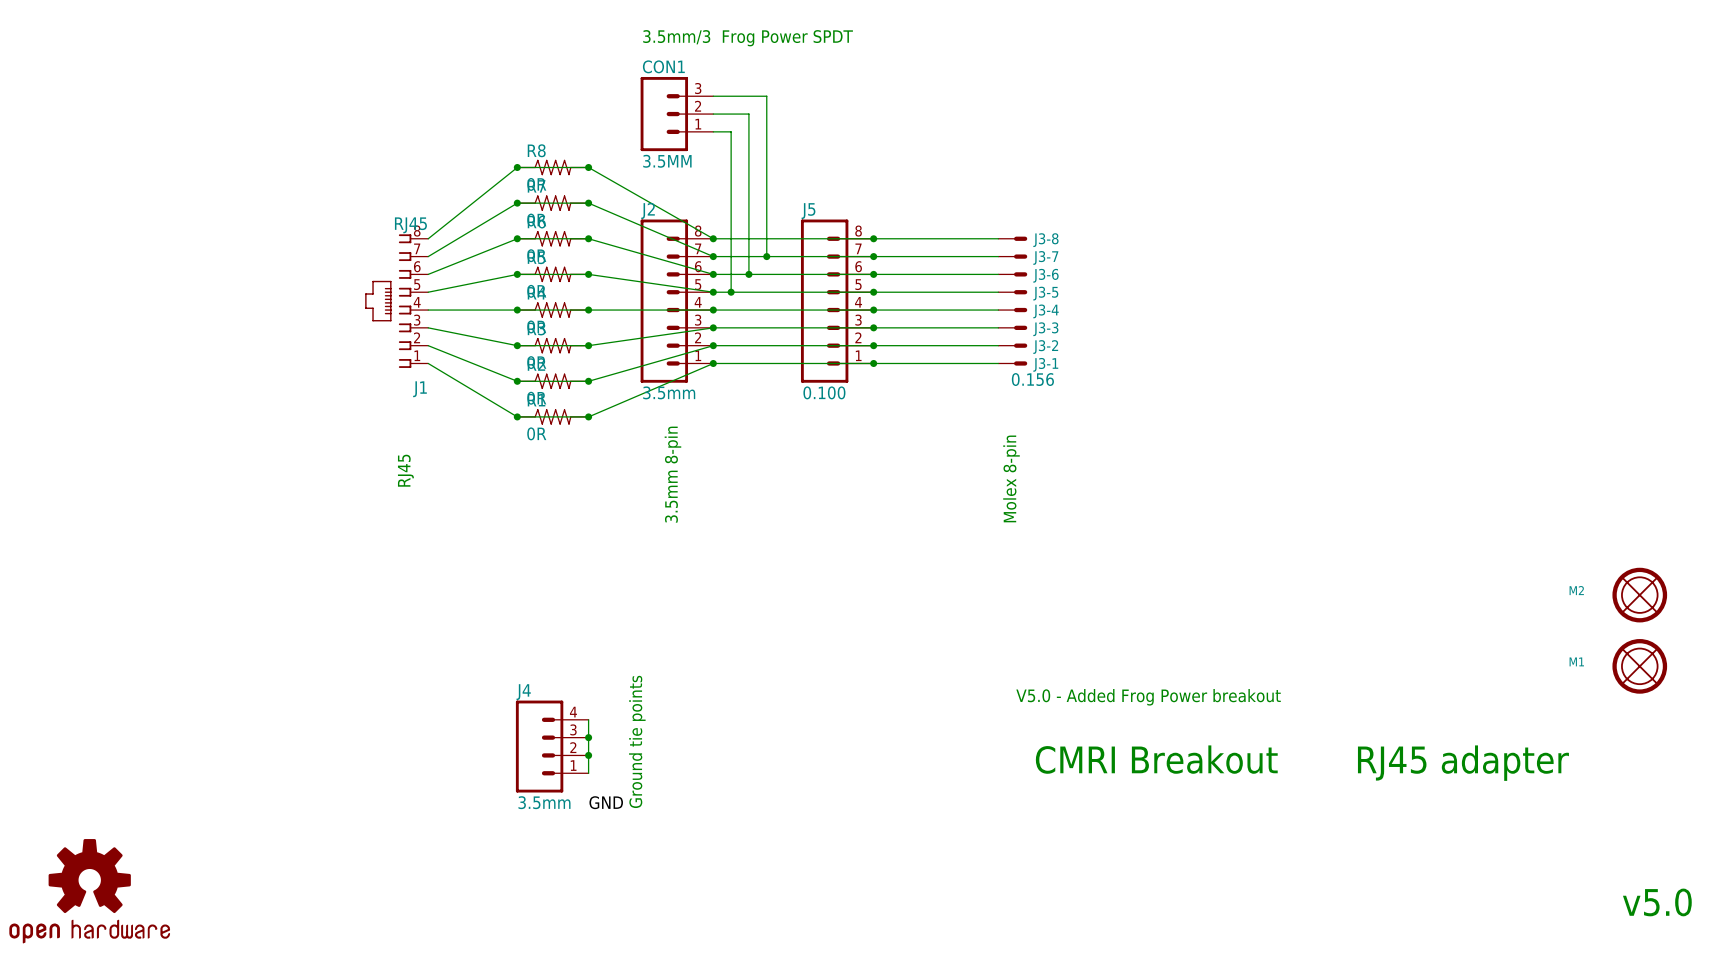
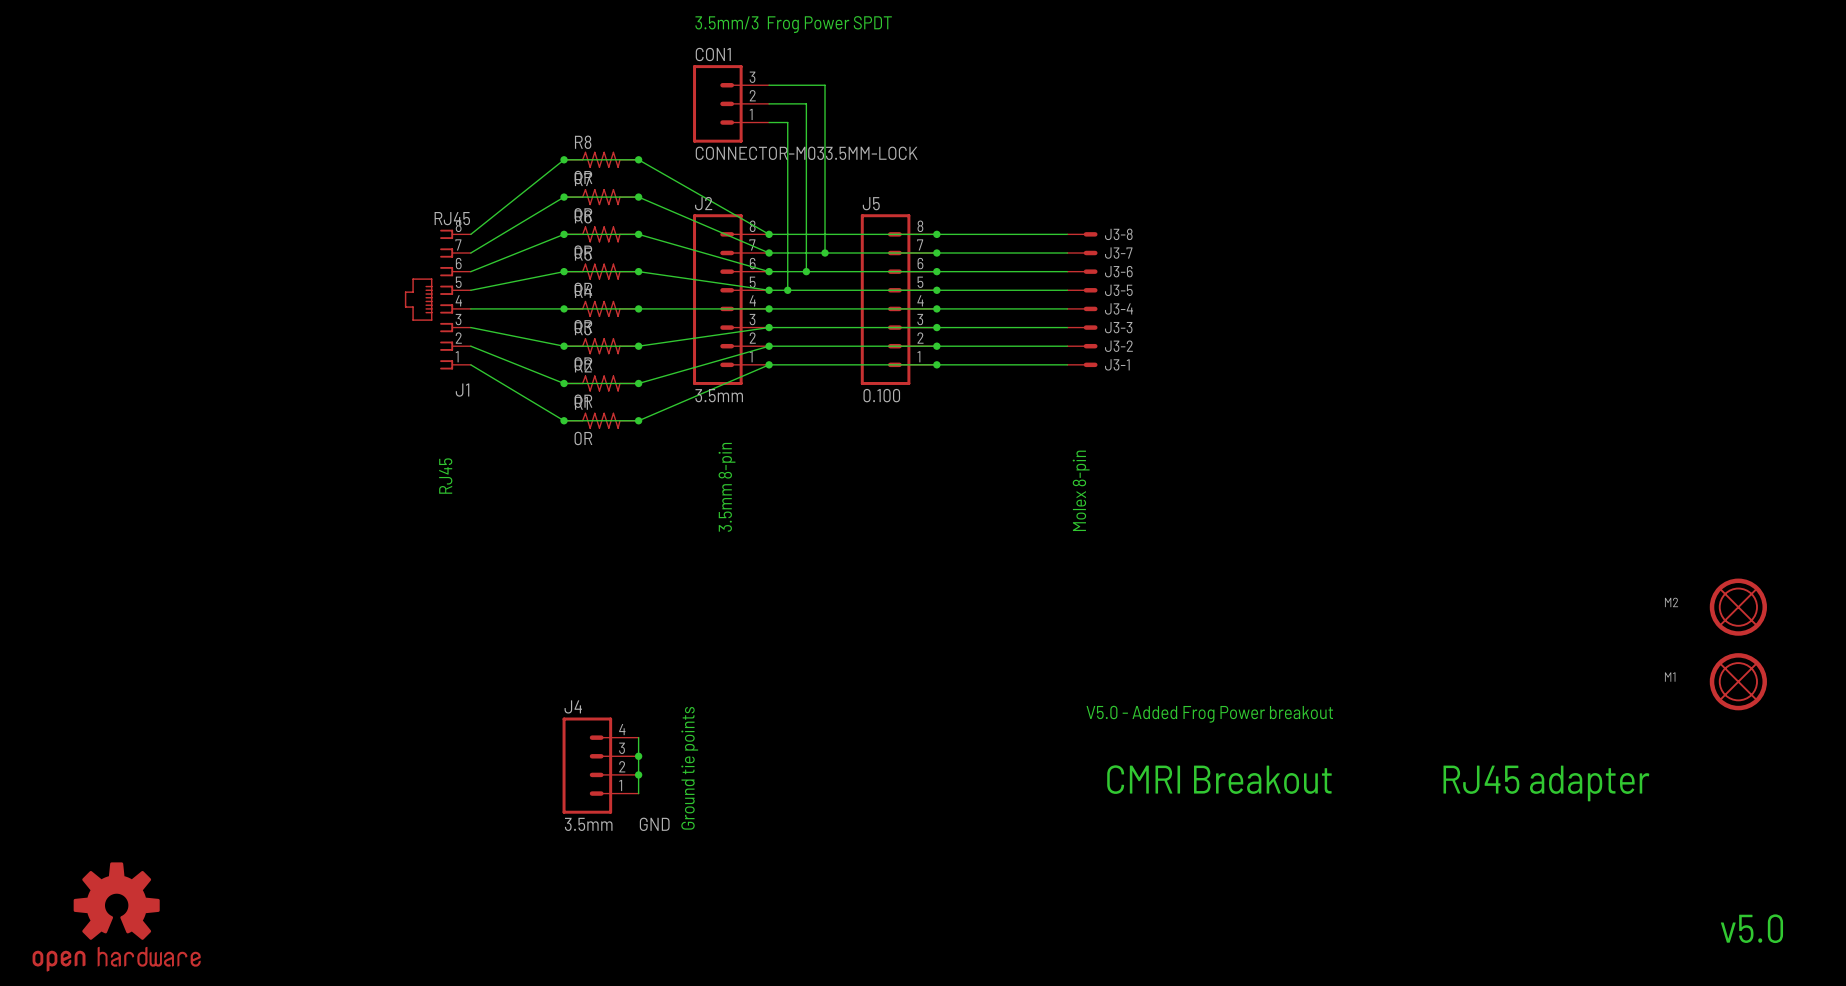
CON1 value: 3.5MM (667, 161) -> CONNECTOR-M033.5MM-LOCK (806, 153)
J3-1 value: 0.156 (1032, 379) -> none

